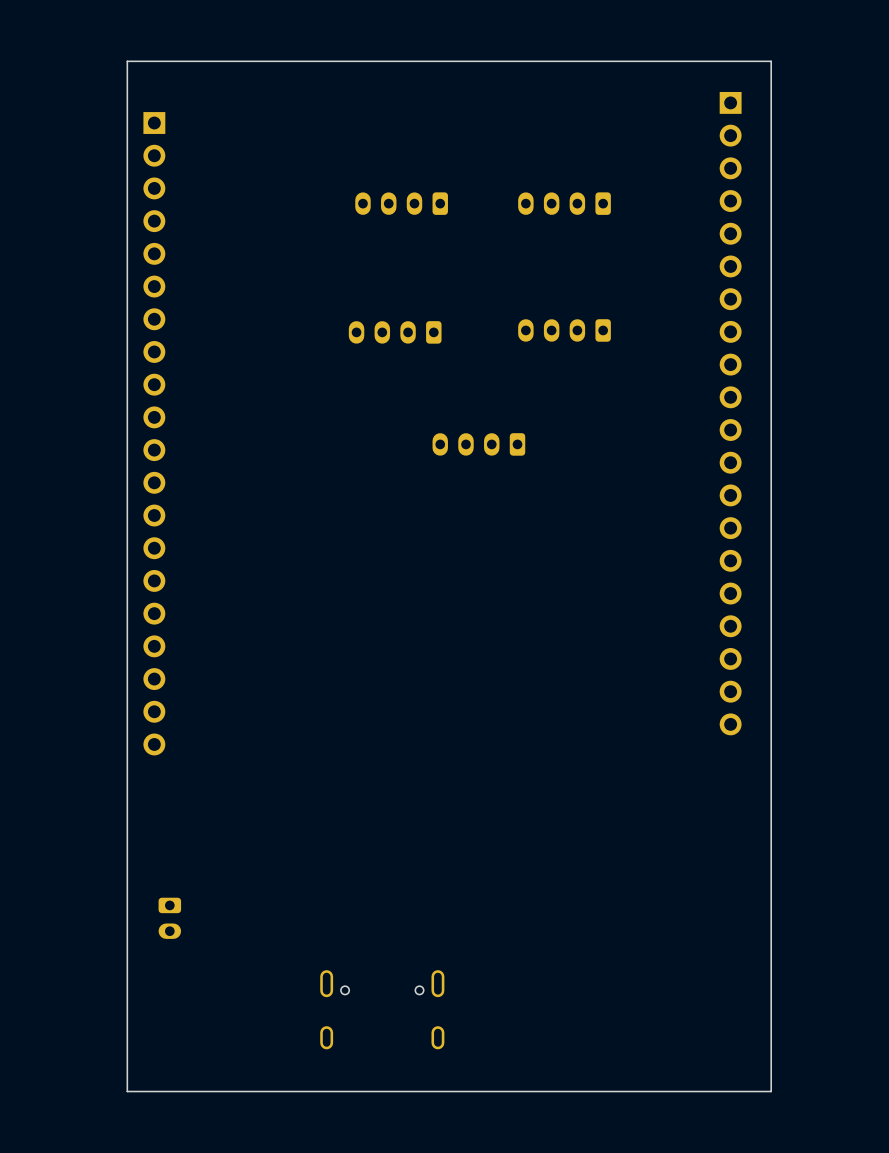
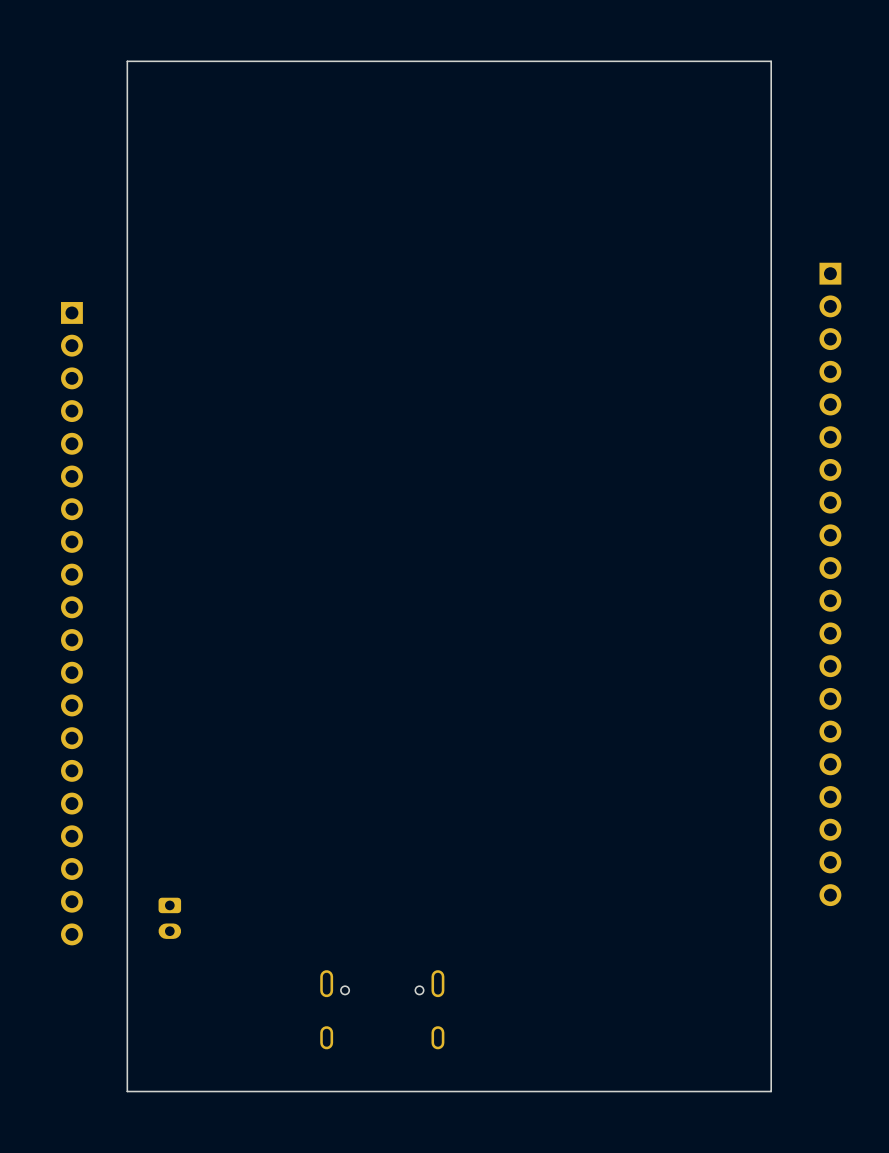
part: (401, 203) -> none
part: (564, 203) -> none
part: (564, 330) -> none
part: (395, 332) -> none
part position: (730, 413) -> (830, 584)
part position: (154, 433) -> (71, 623)
part: (478, 444) -> none

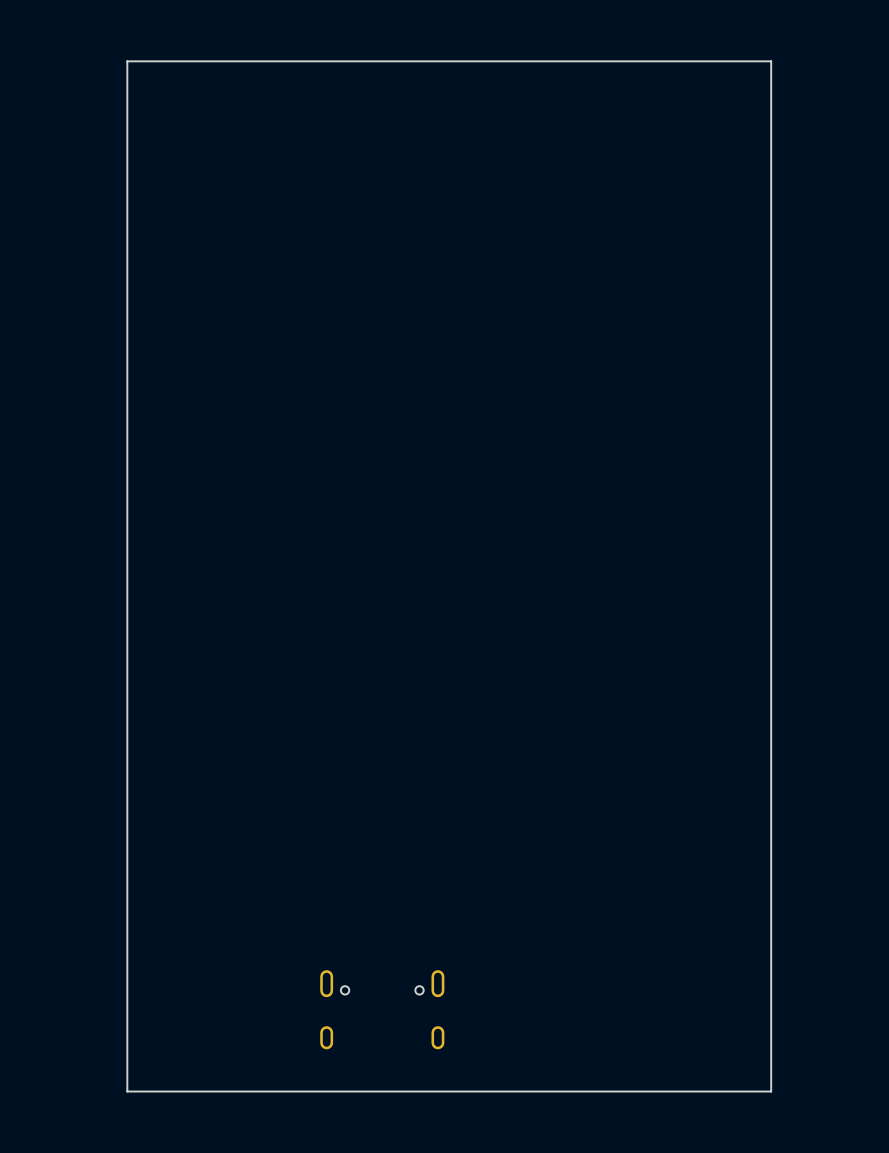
part: (830, 584) -> none
part: (71, 623) -> none
part: (169, 918) -> none

